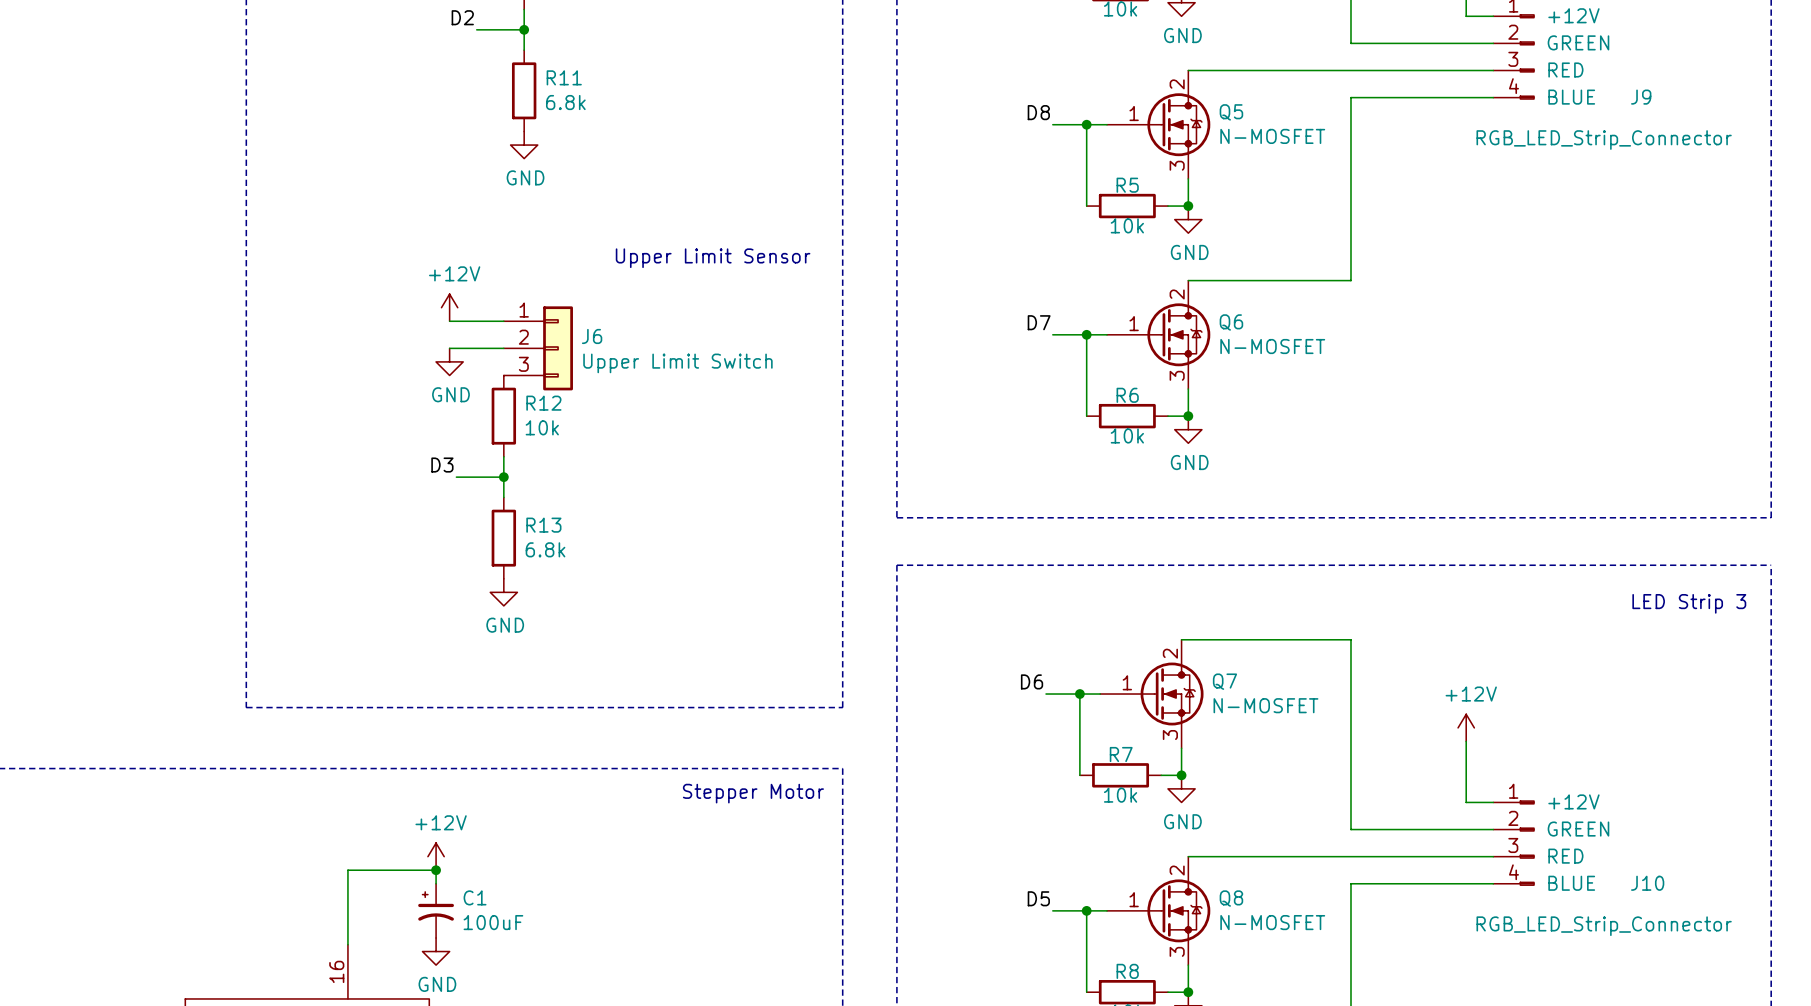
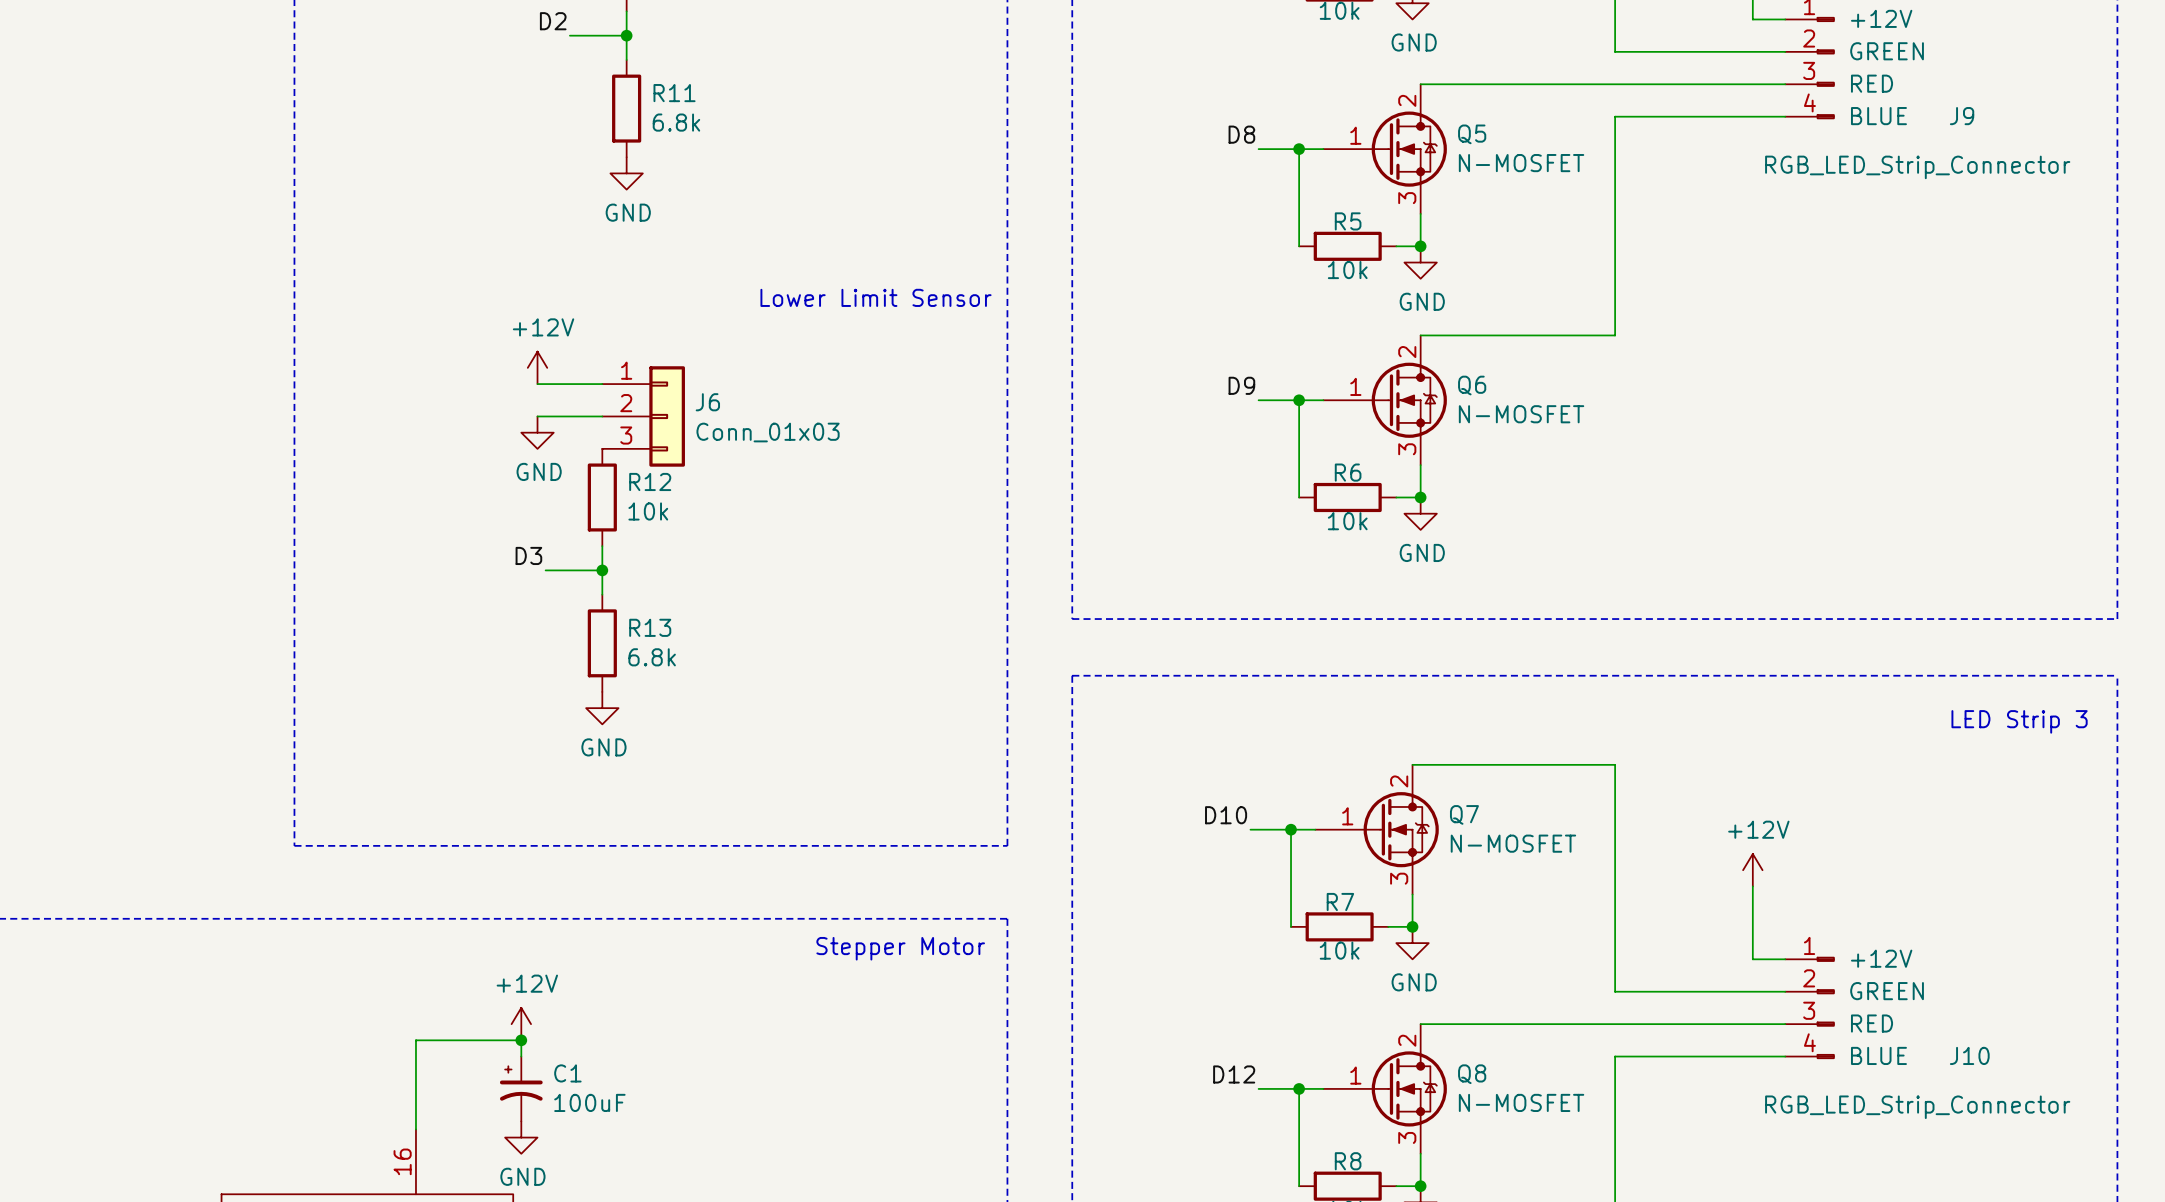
text: Upper Limit Sensor (713, 258) -> Lower Limit Sensor (876, 297)
label: D7 (1039, 322) -> D9 (1241, 385)
J6 value: Upper Limit Switch (677, 363) -> Conn_01x03 (768, 432)
label: D6 (1032, 681) -> D10 (1226, 815)
label: D5 (1038, 898) -> D12 (1234, 1074)

